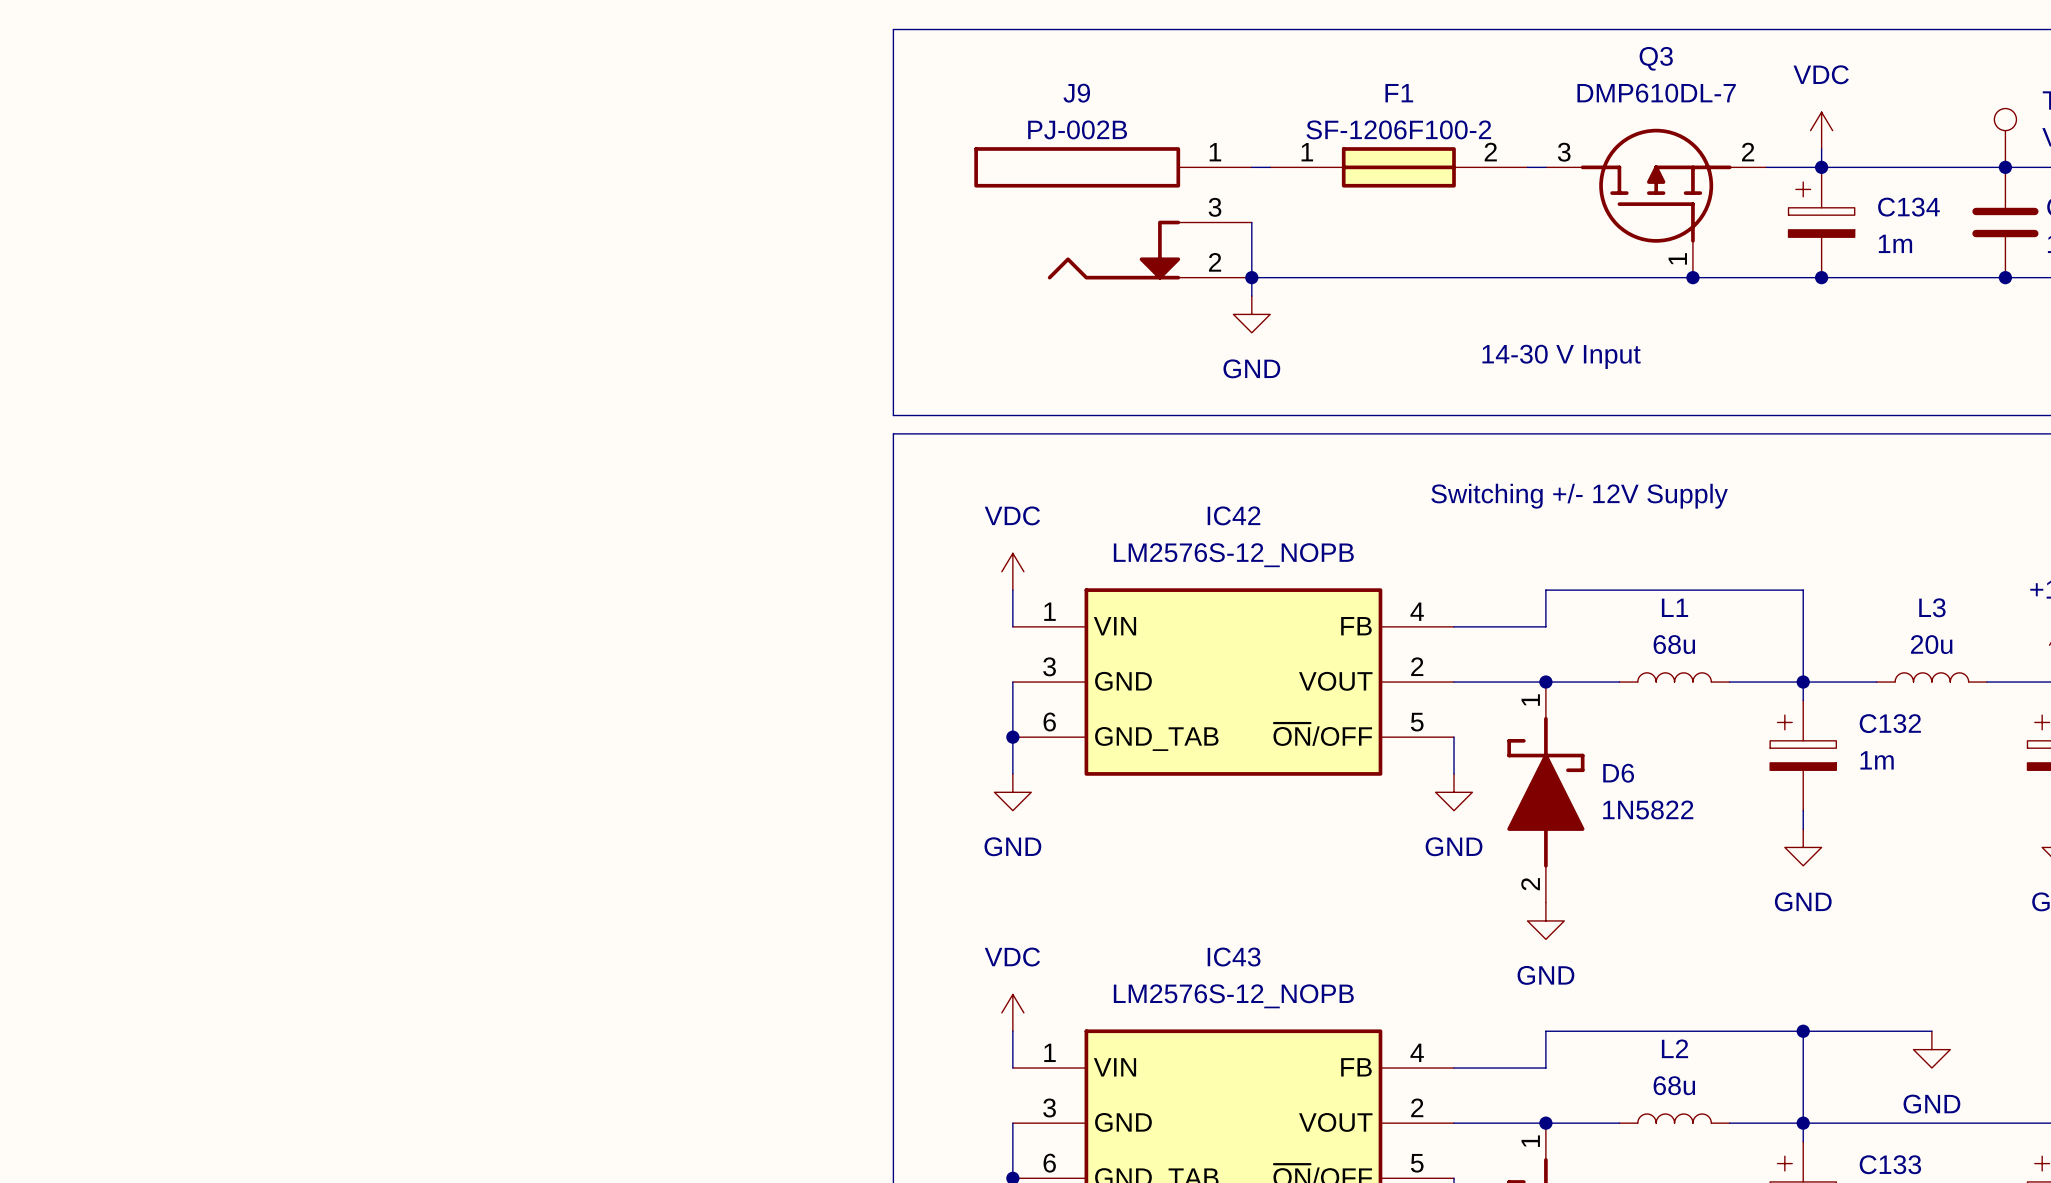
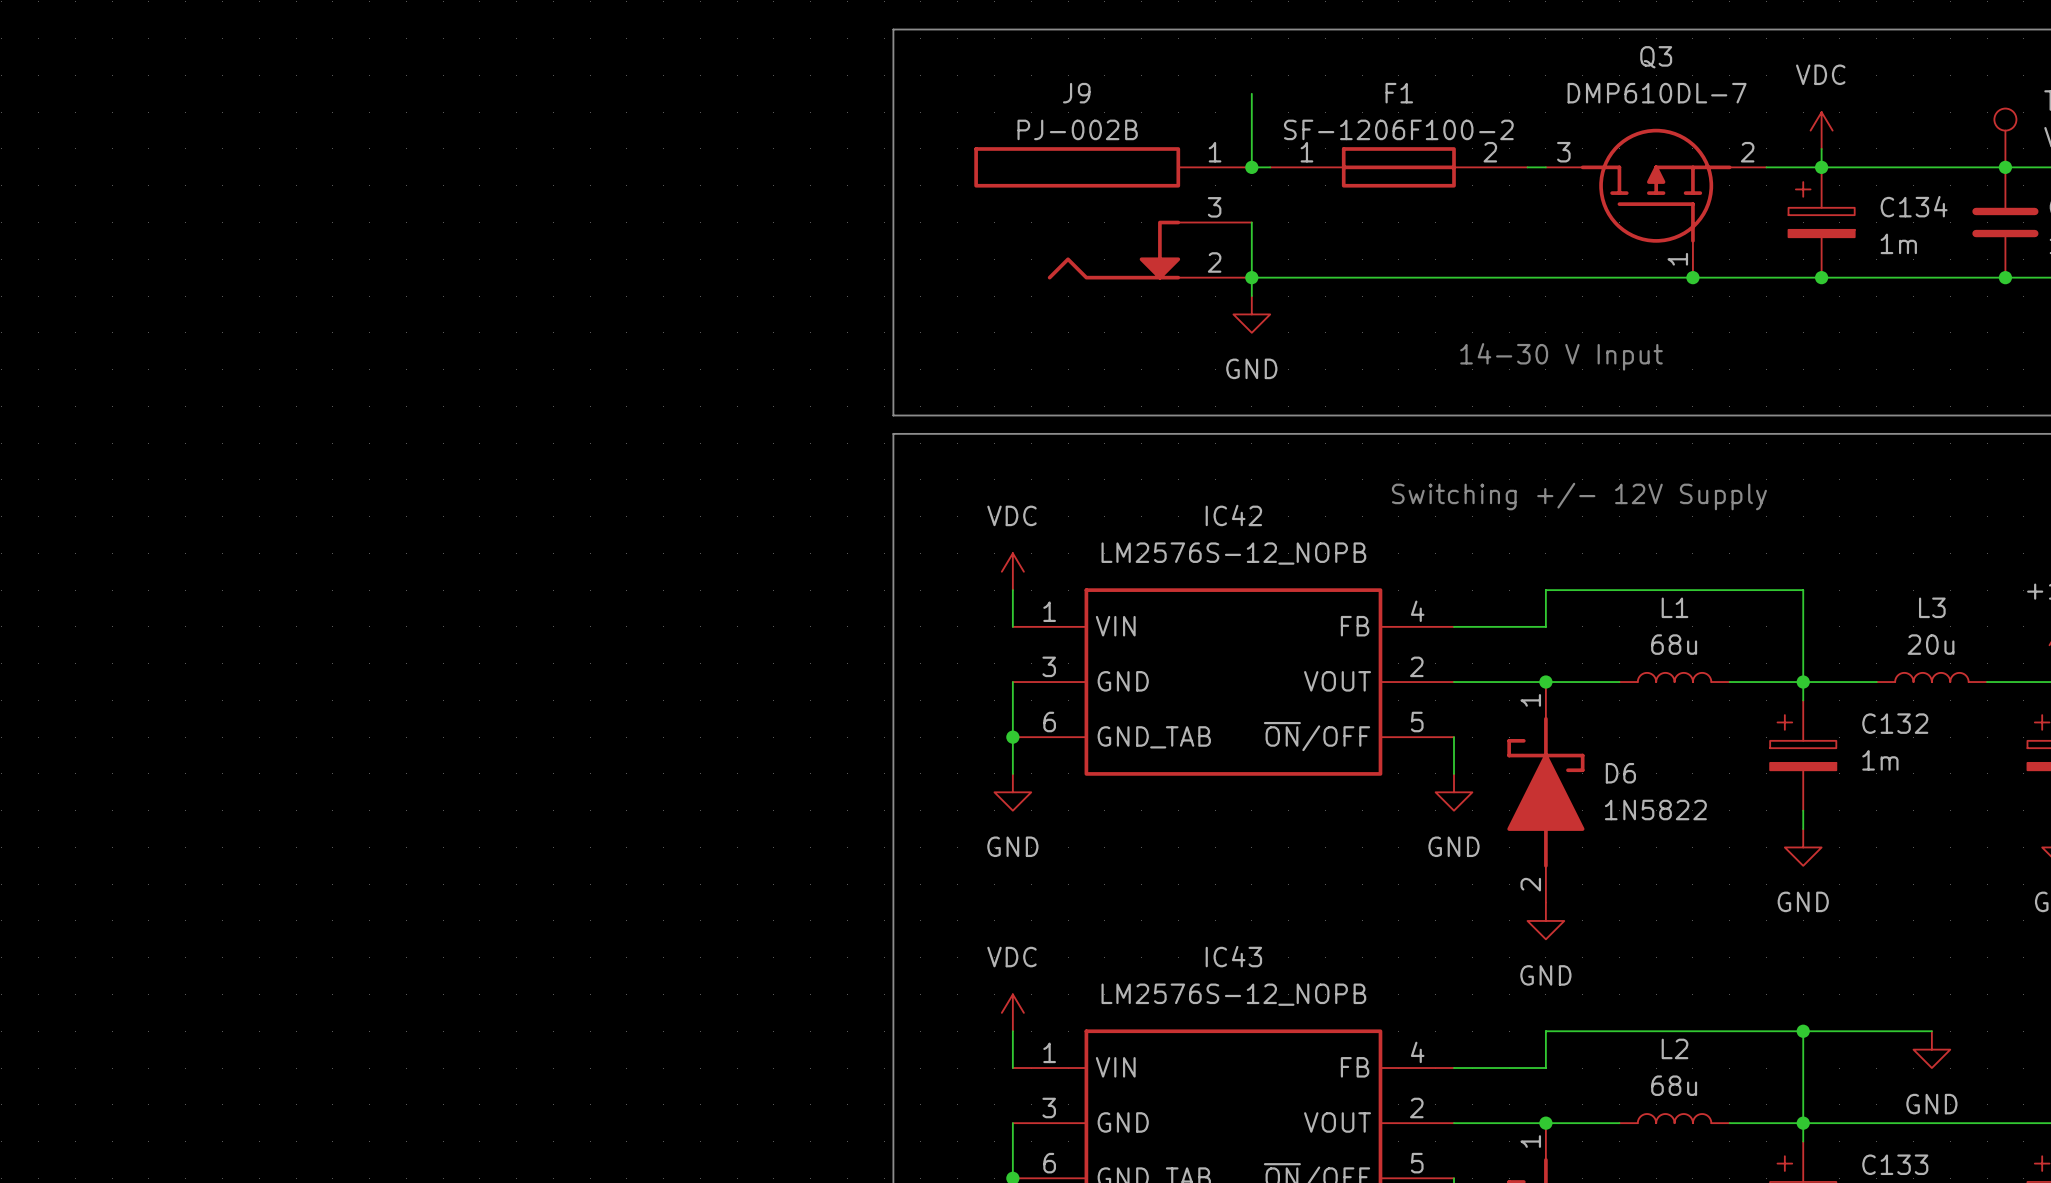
wire: none -> (1251, 93) (1251, 167)
junction: none -> (1251, 167)

